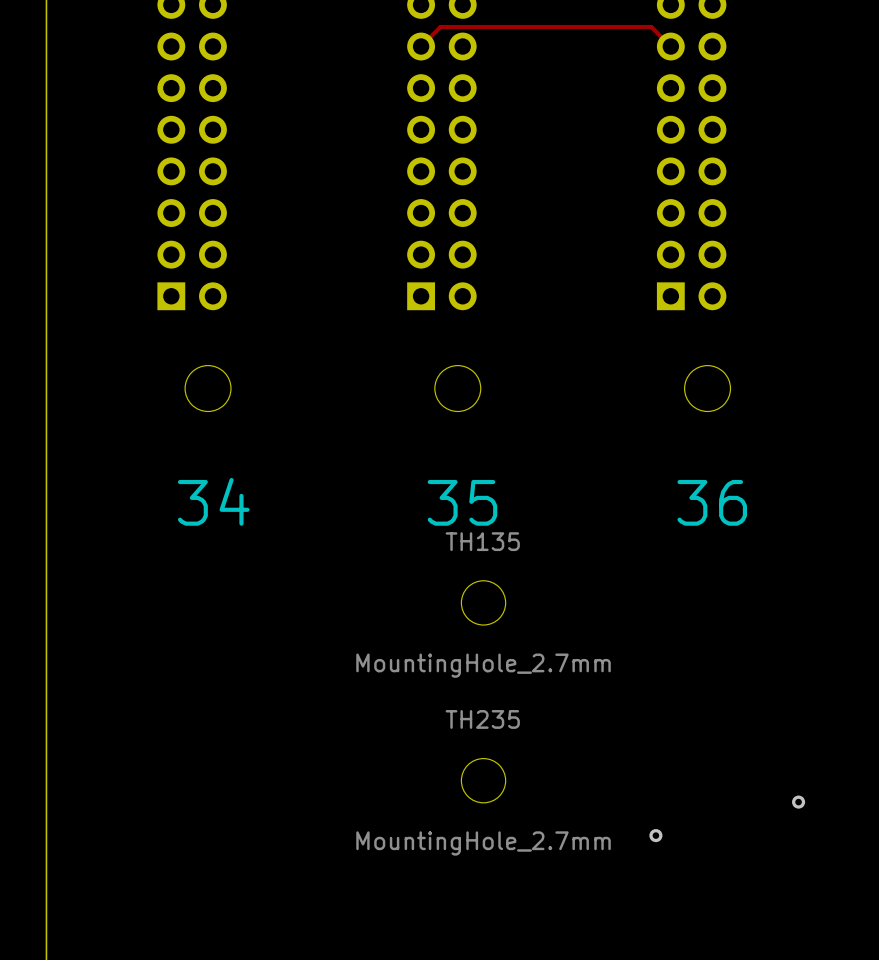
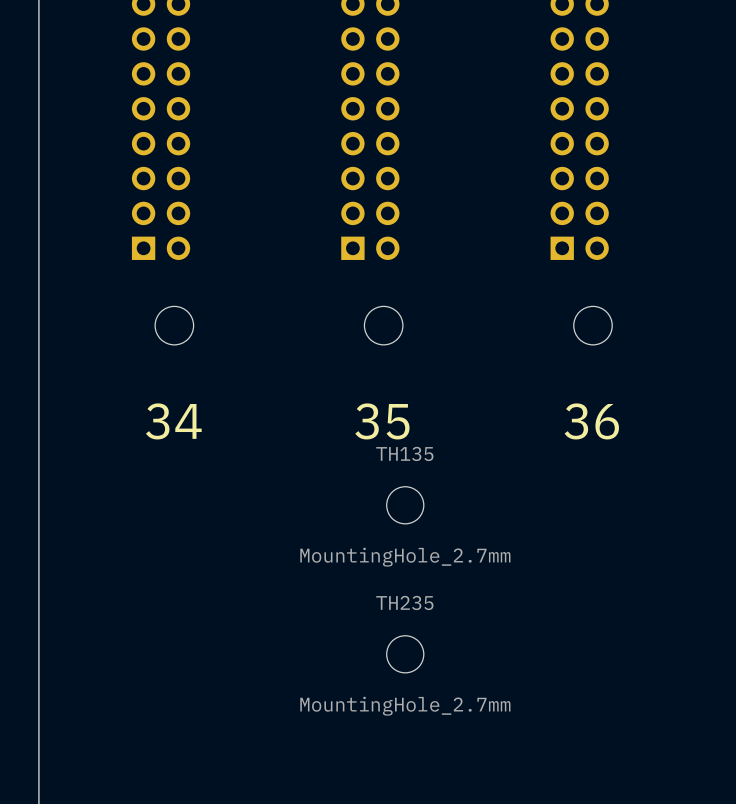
track: (421, 46) (440, 27) (651, 27) (670, 46) -> none
via: (798, 802) -> none
via: (655, 835) -> none

